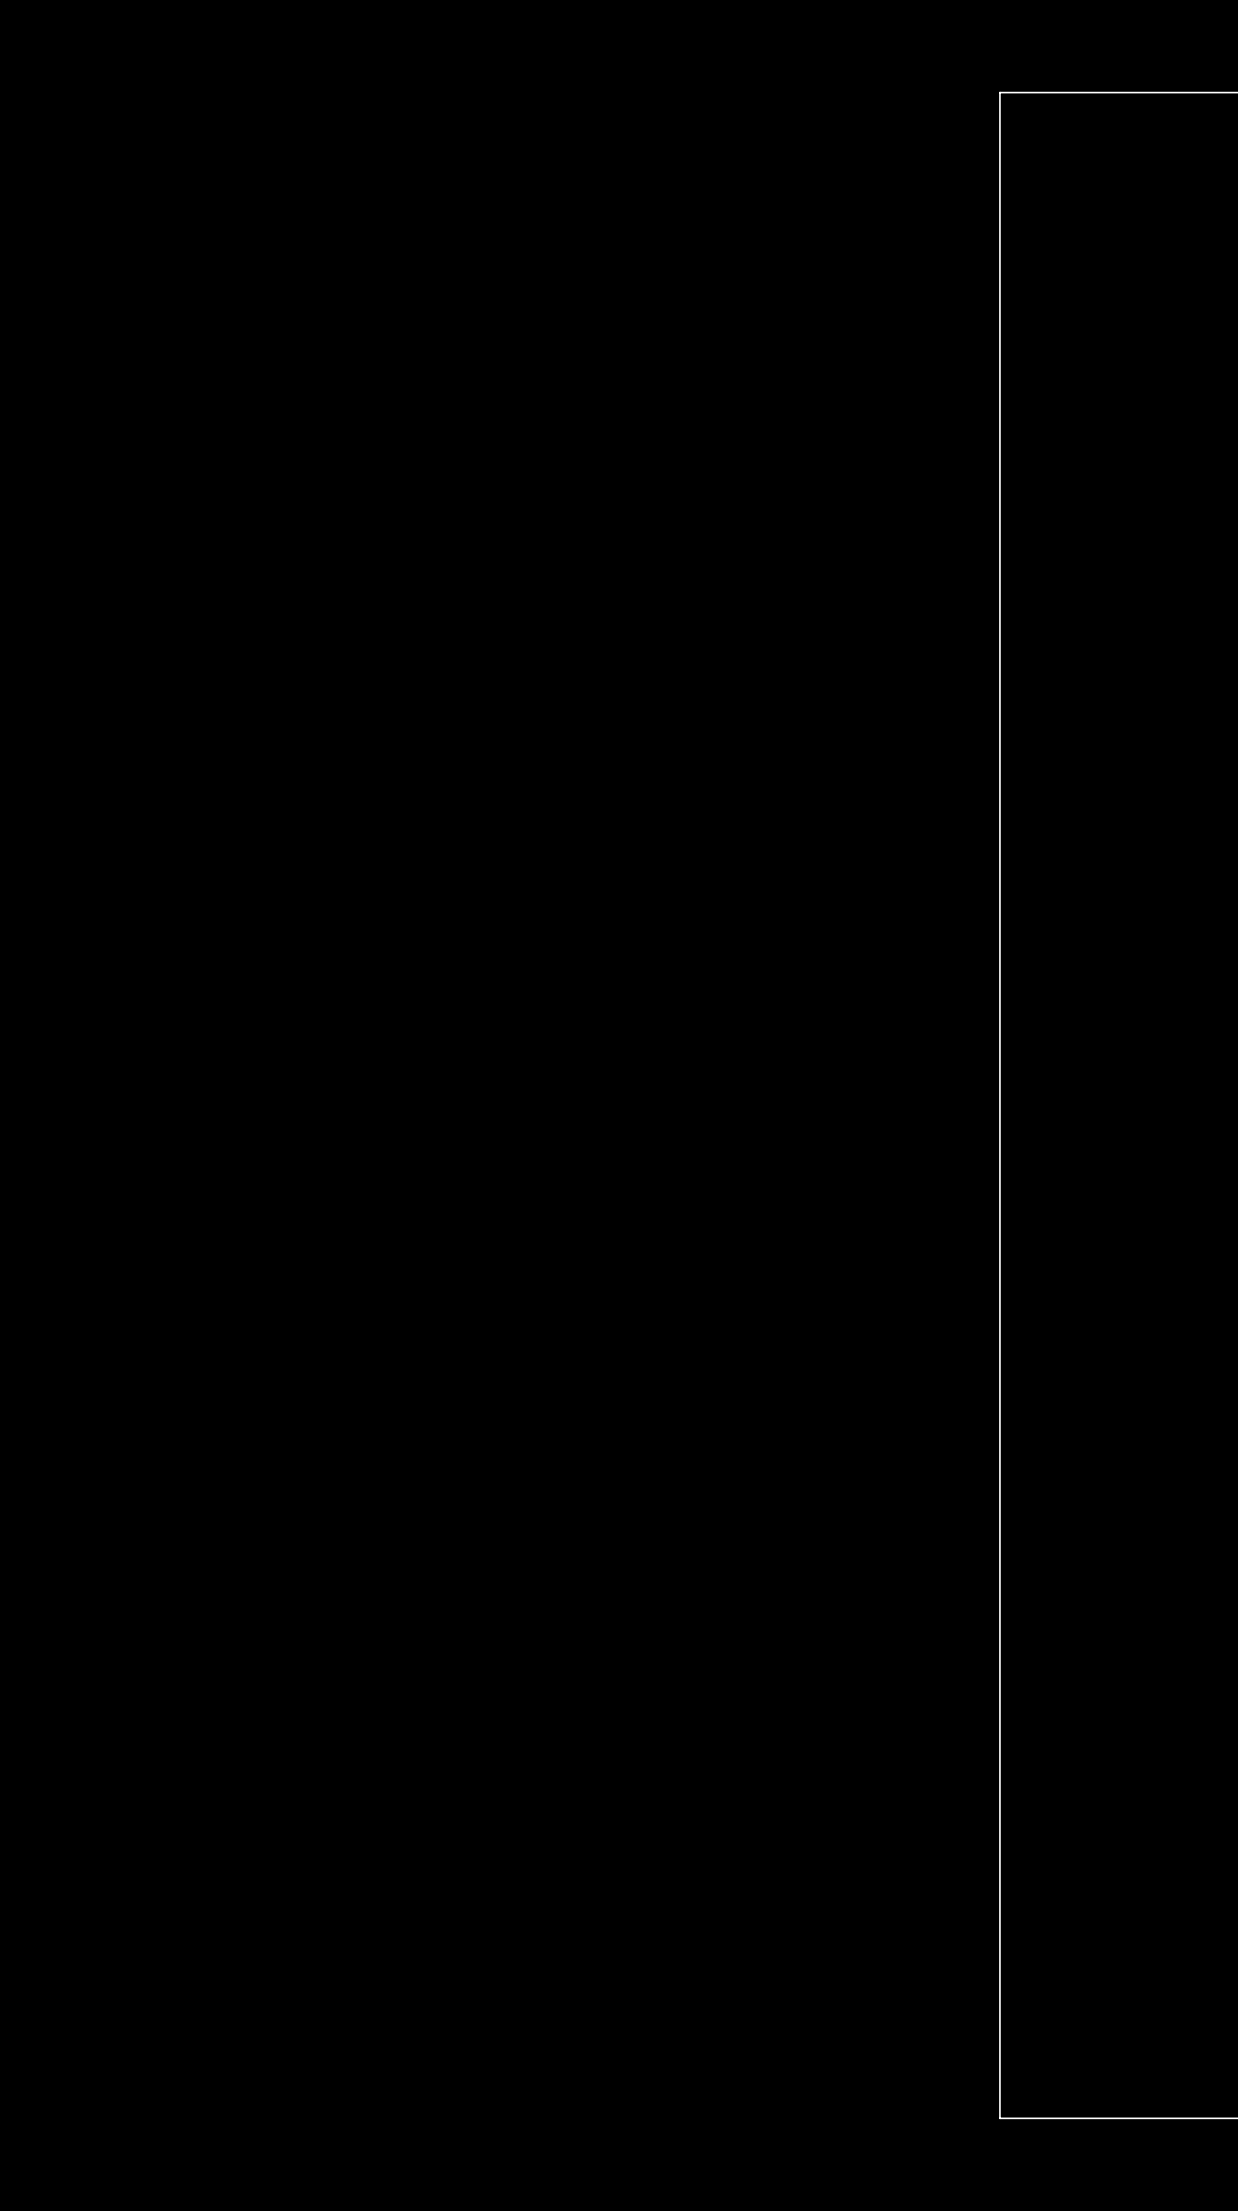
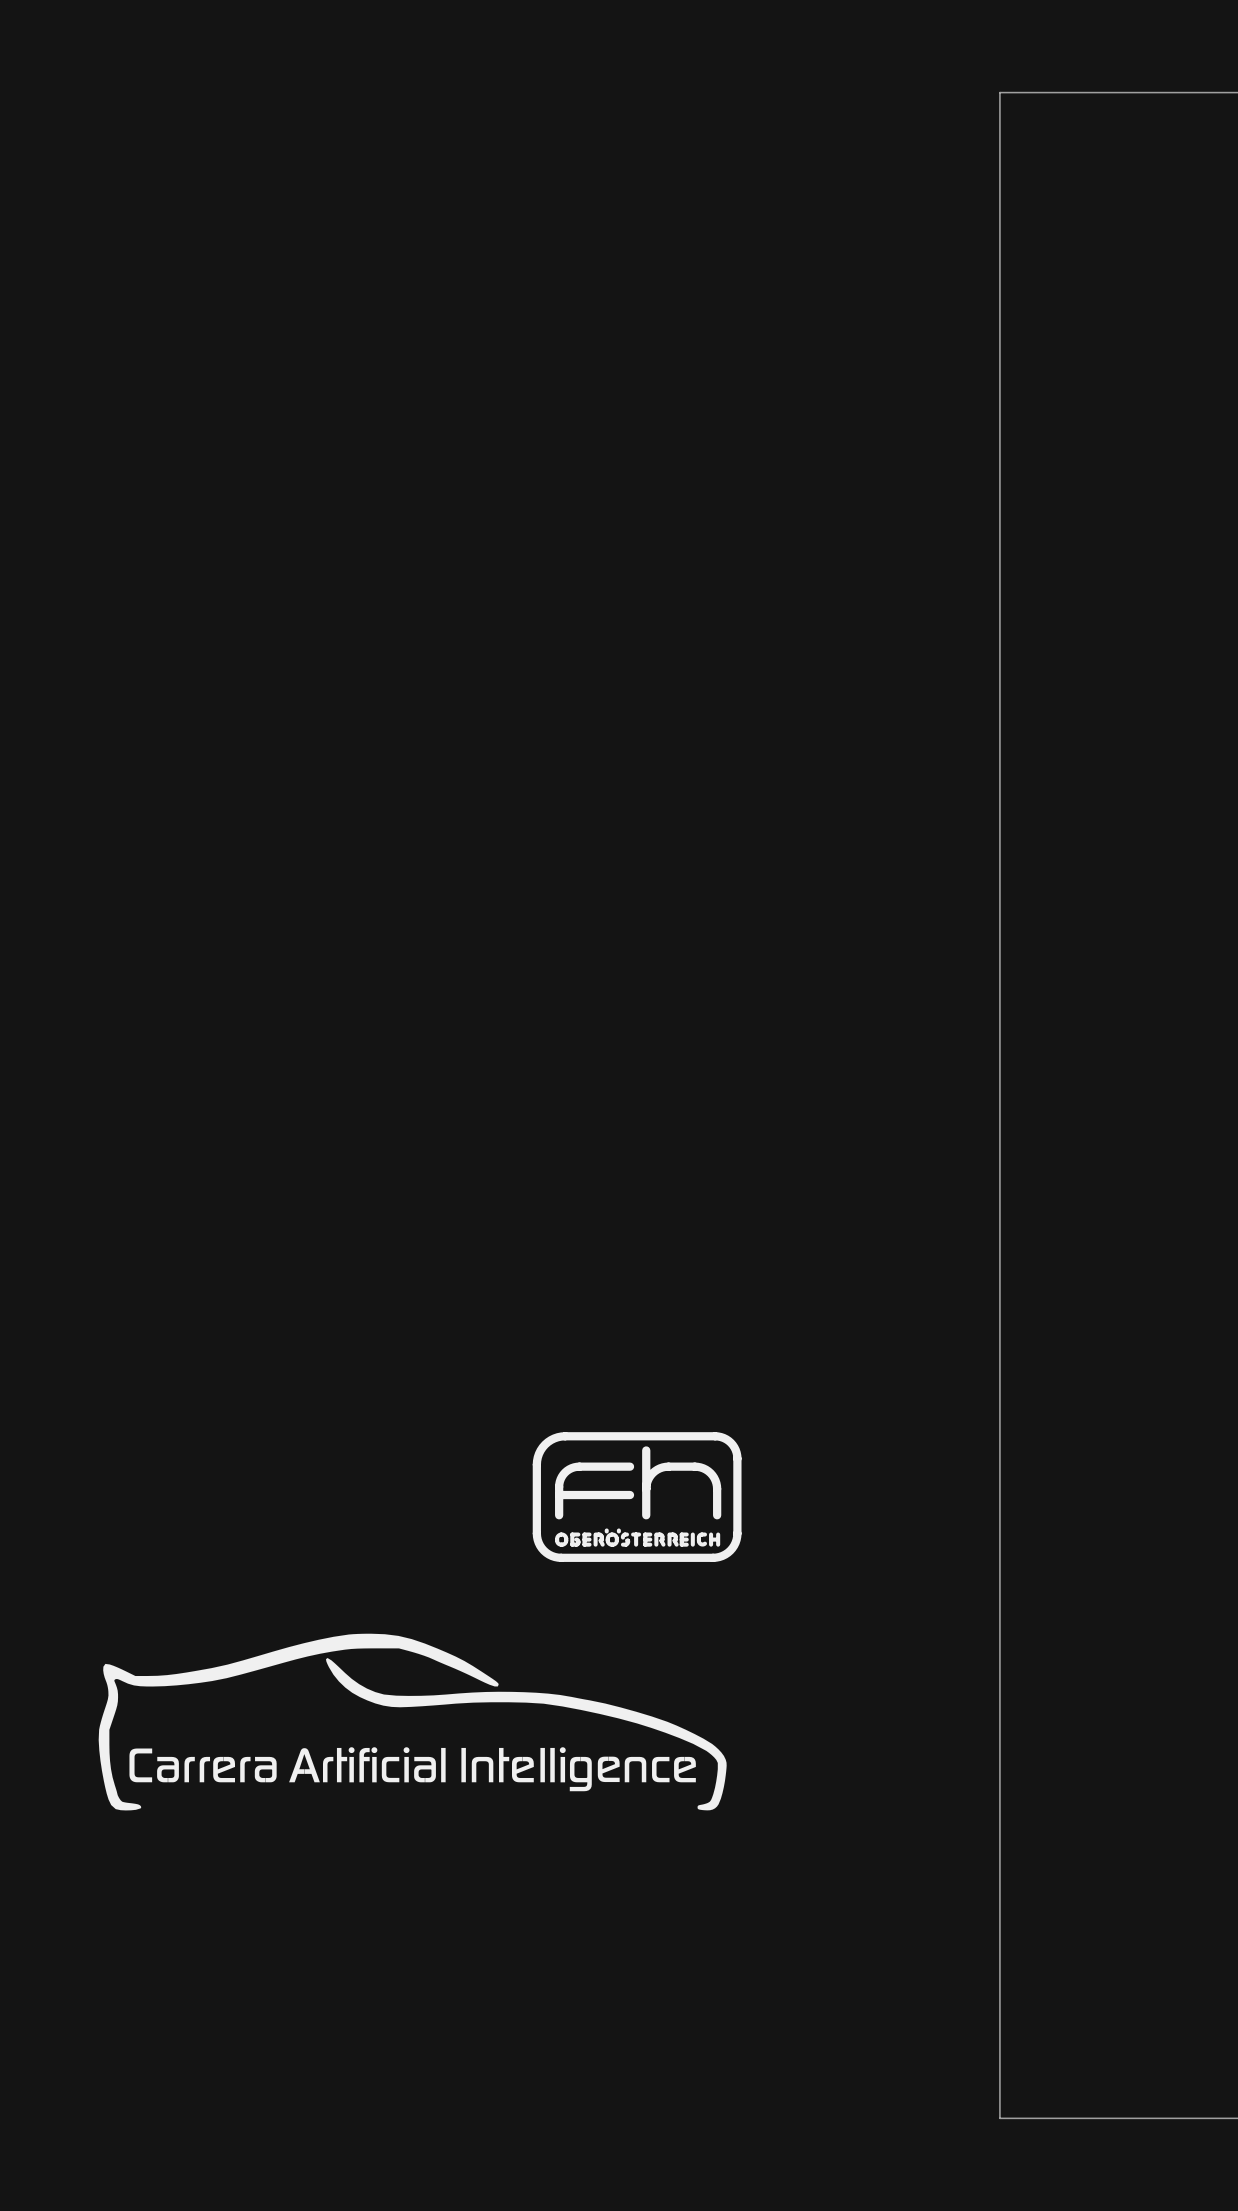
drawing: none -> [532, 1432, 742, 1562]
drawing: none -> [98, 1633, 727, 1811]

